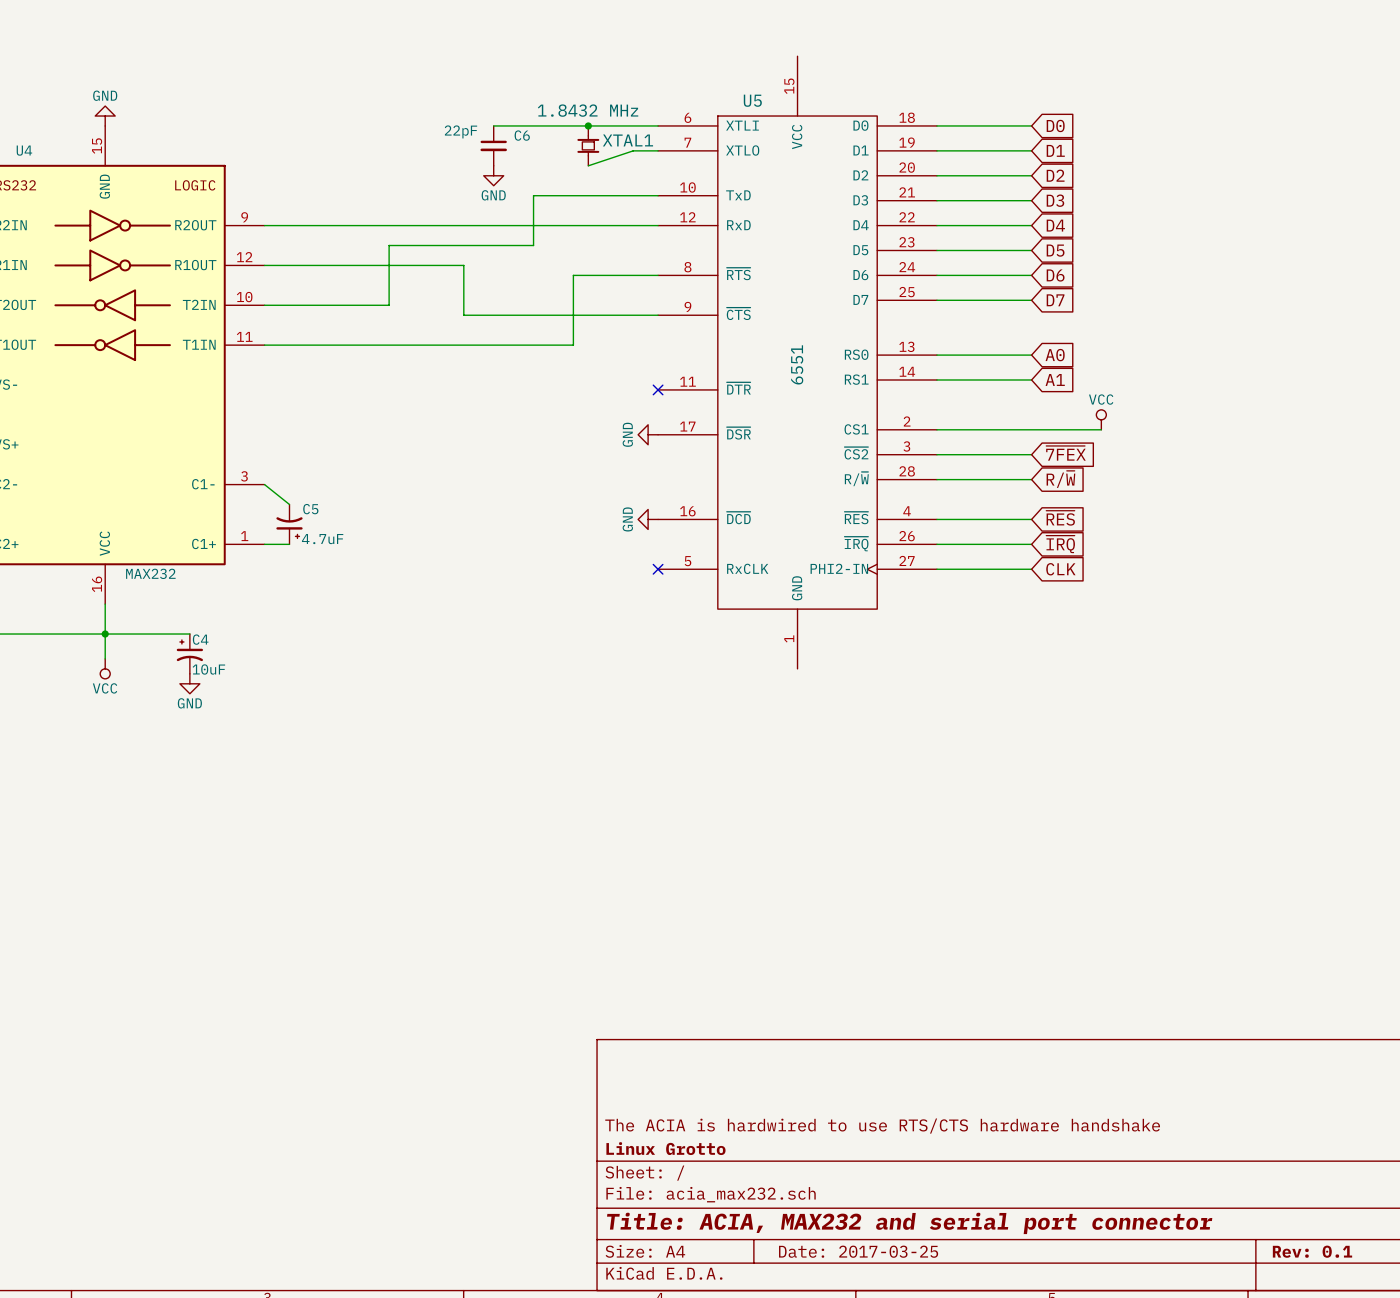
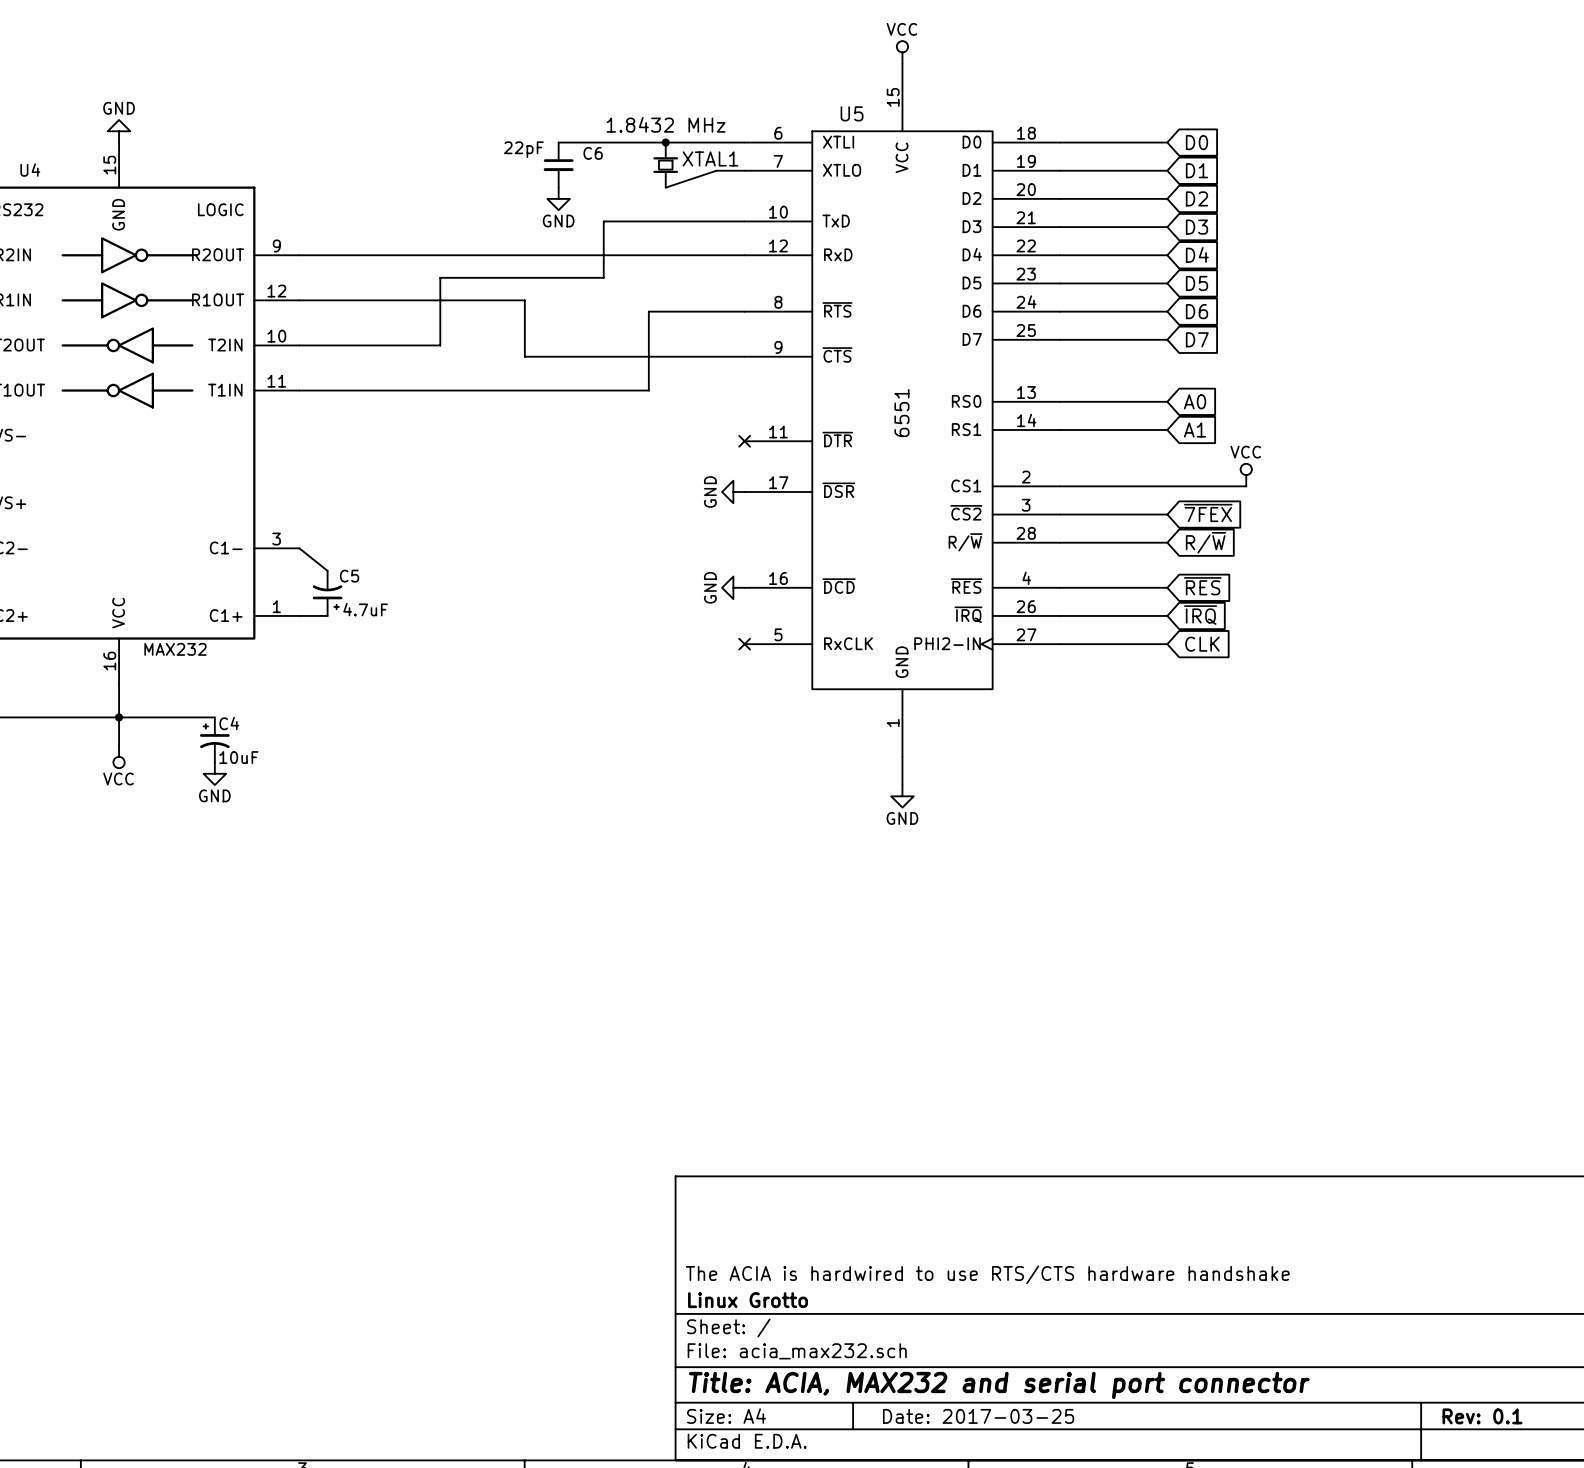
power symbol: none -> VCC (902, 52)
wire: none -> (902, 756) (902, 785)
power symbol: none -> GND (902, 796)

